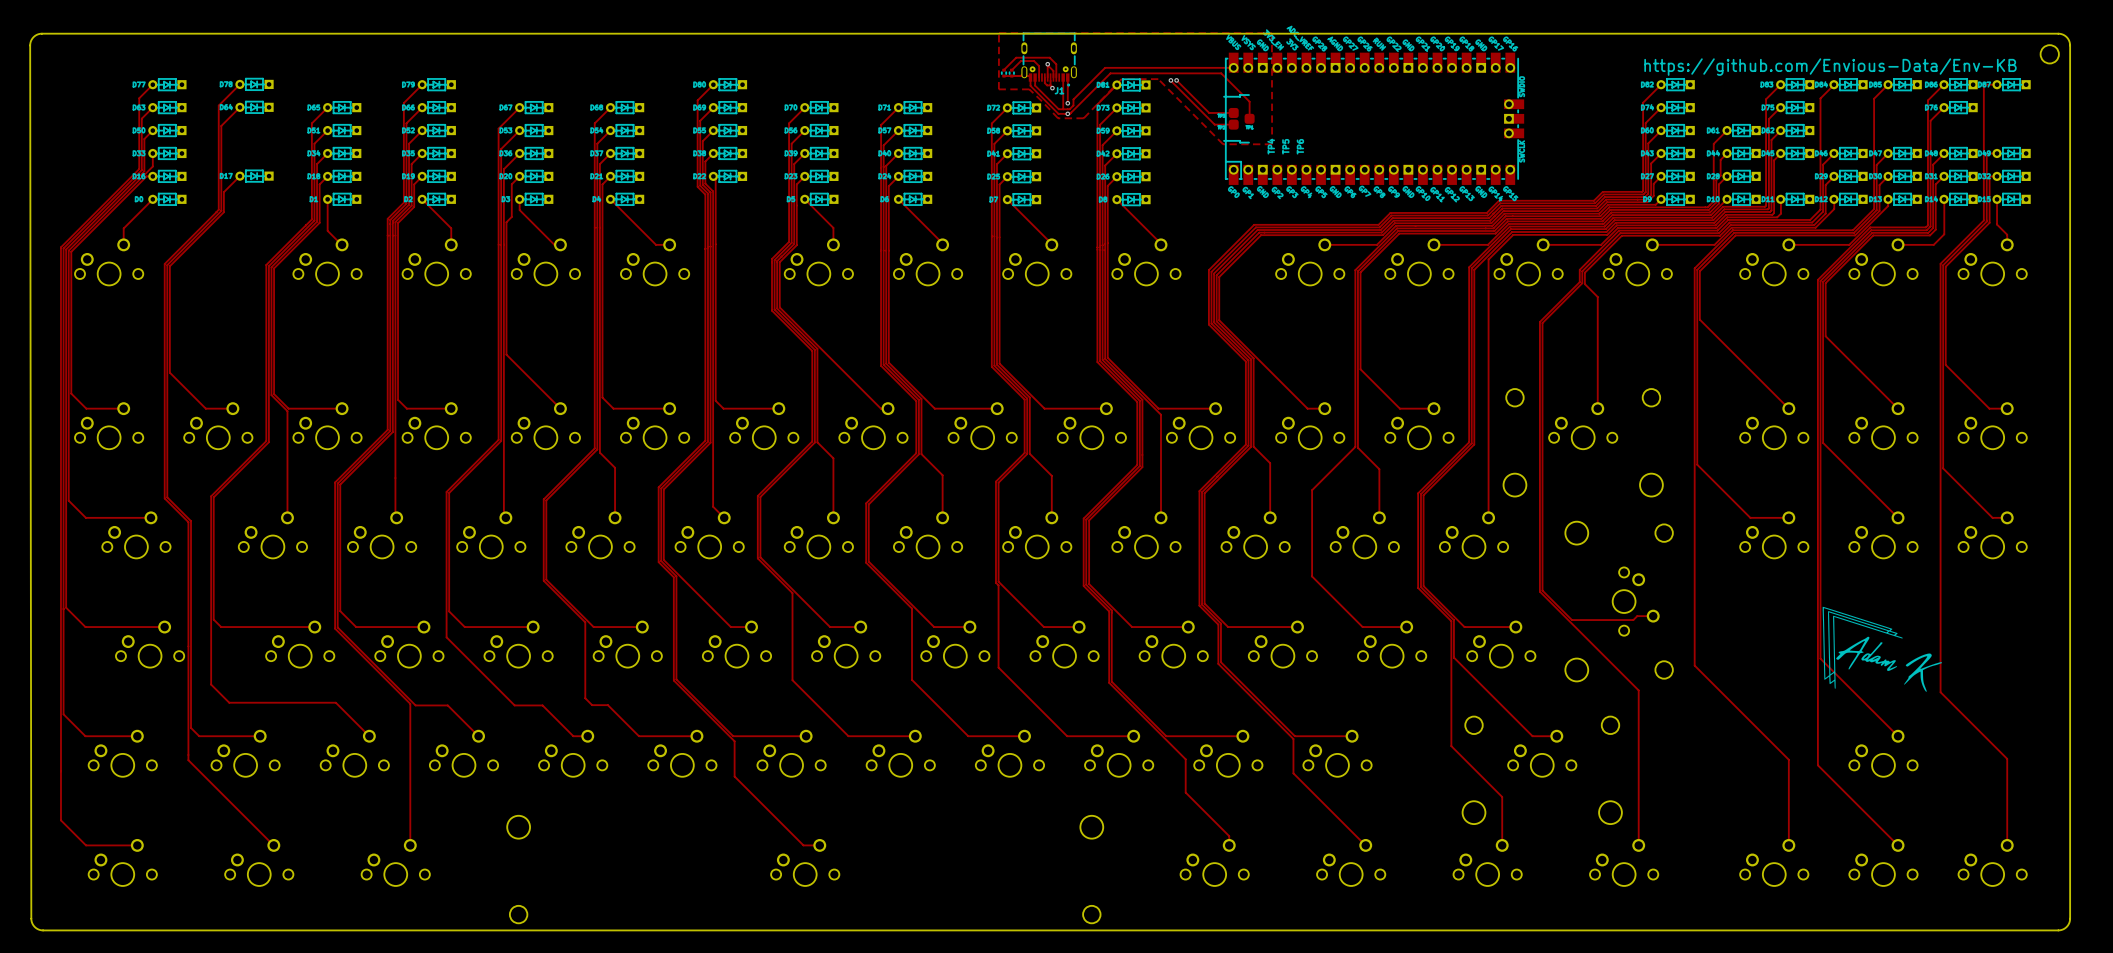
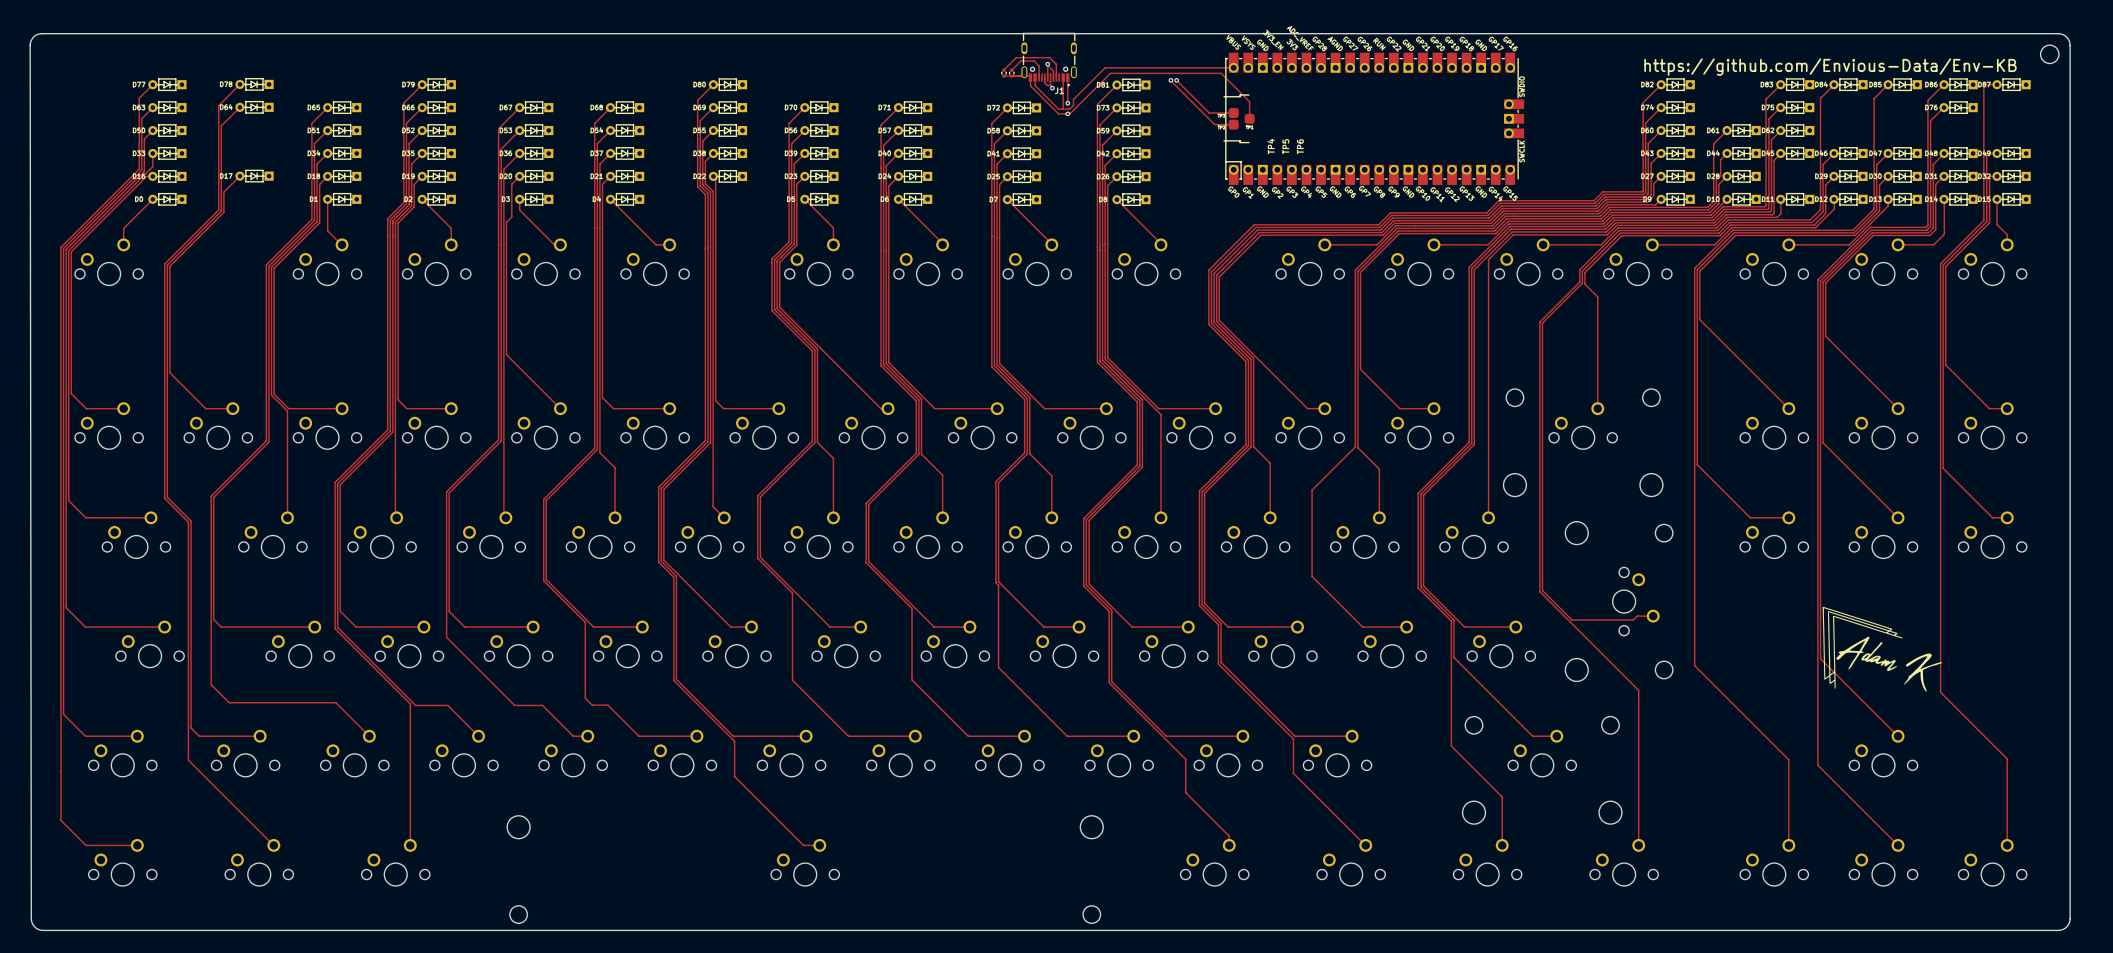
zone outline: (998, 33) (998, 89) (1029, 89) (1058, 118) (1083, 118) (1121, 79) (1158, 79) (1223, 144) (1272, 144) (1271, 33) (998, 33) -> none

